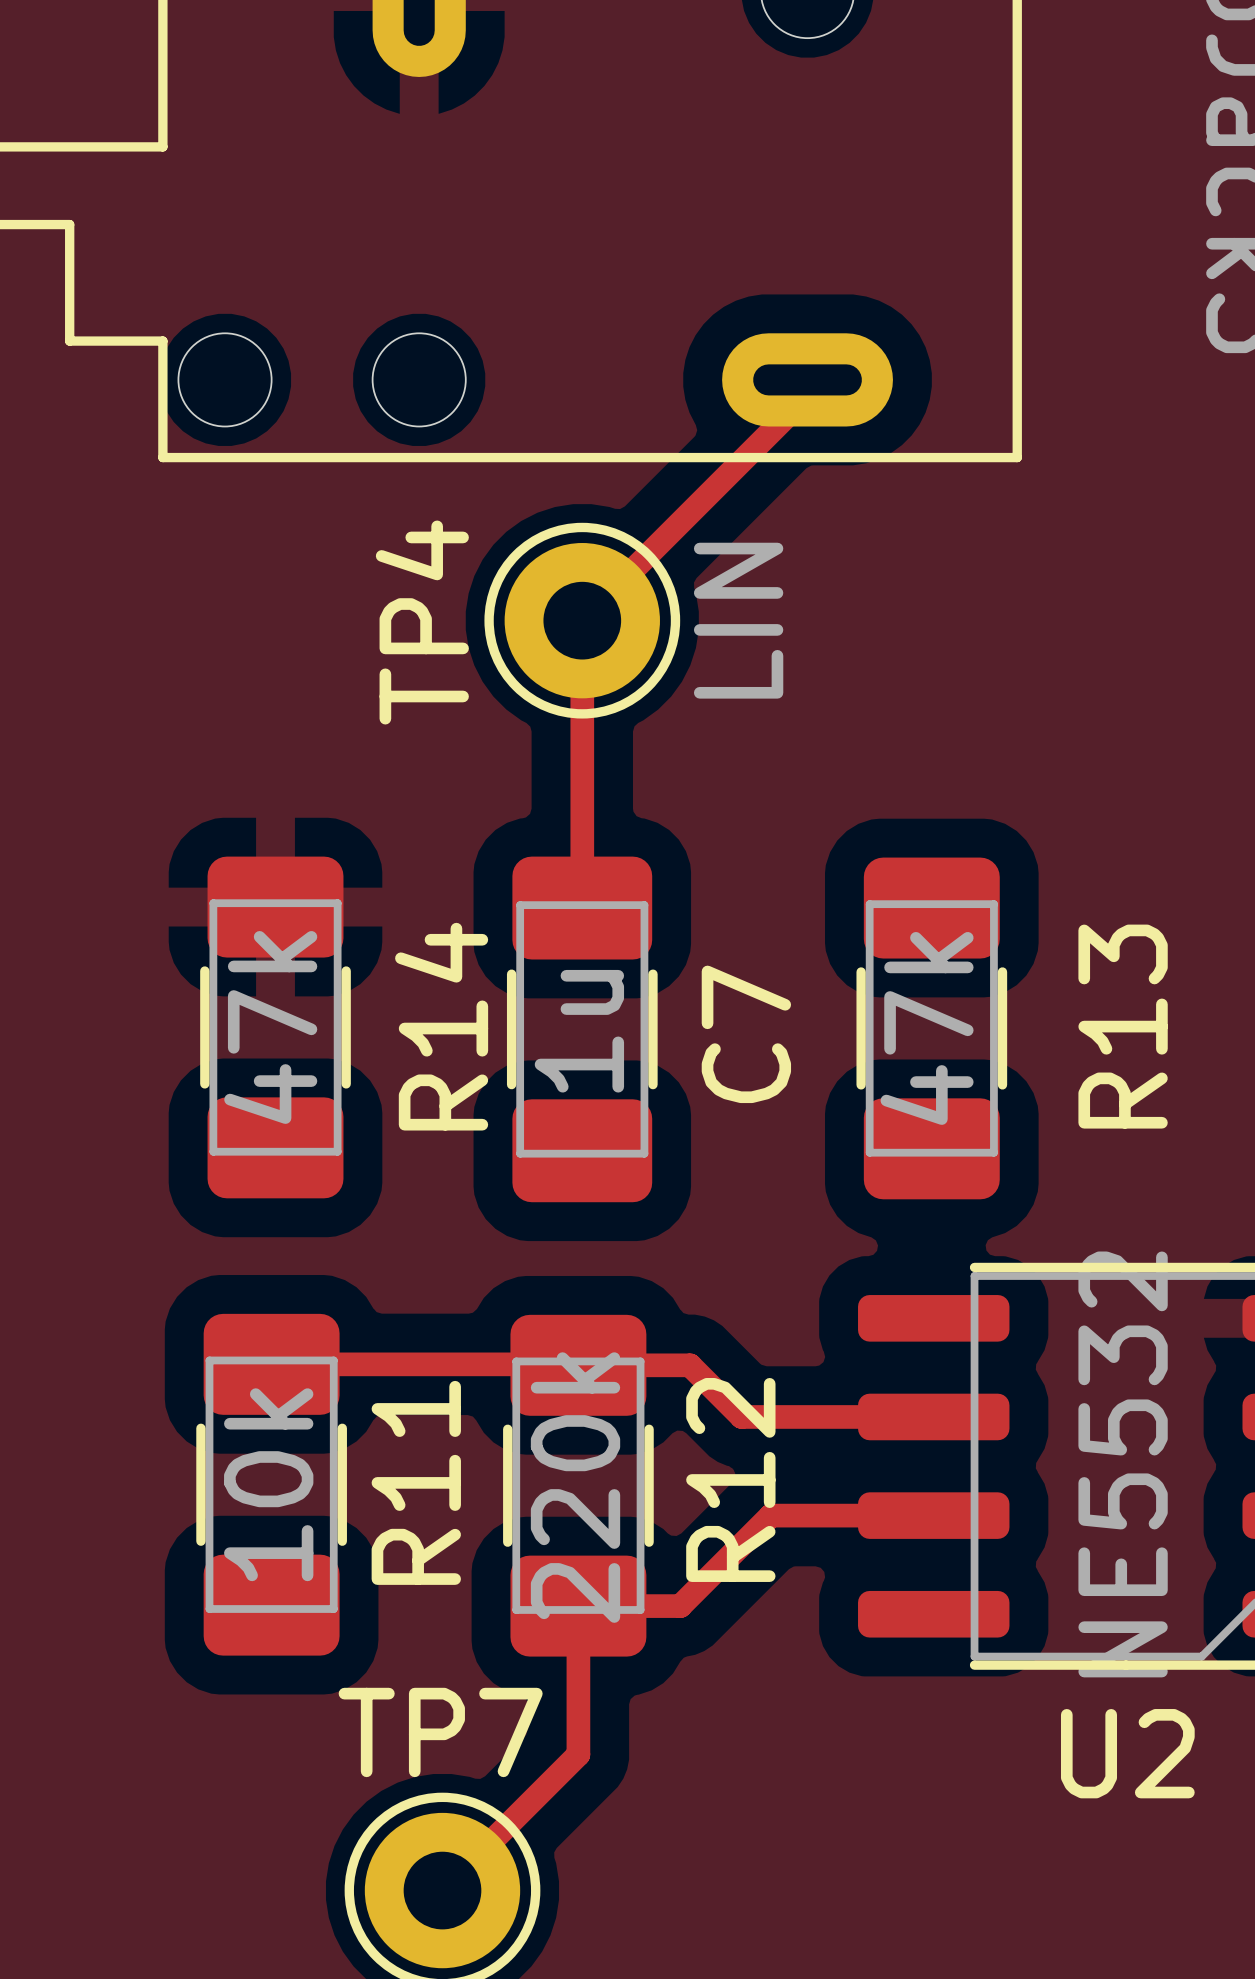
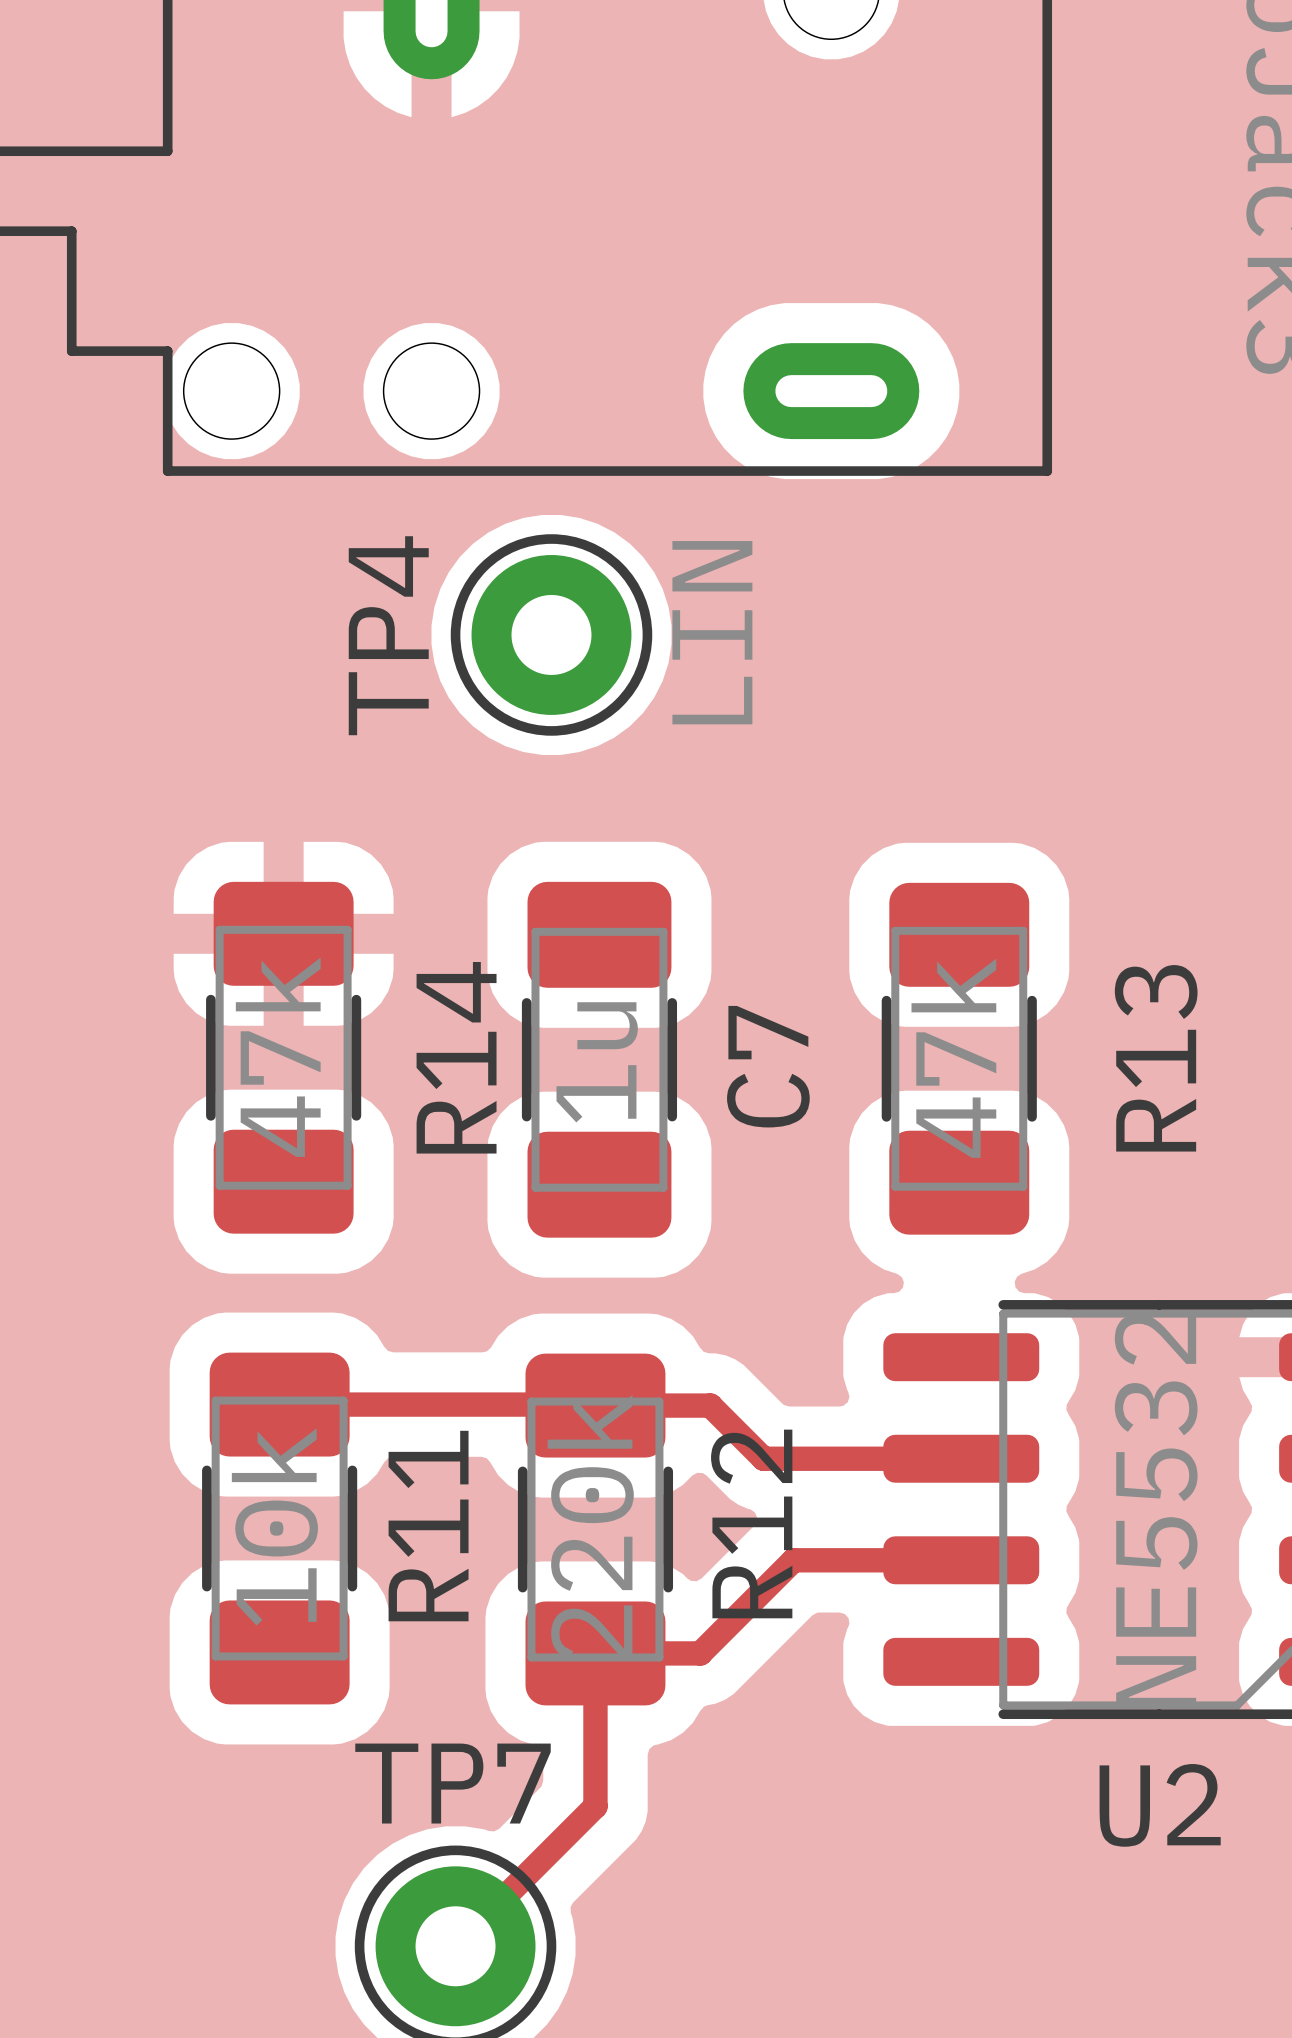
track: (807, 379) (807, 395) (582, 620) (582, 908) -> none
TP4 position: (582, 620) -> (551, 634)

